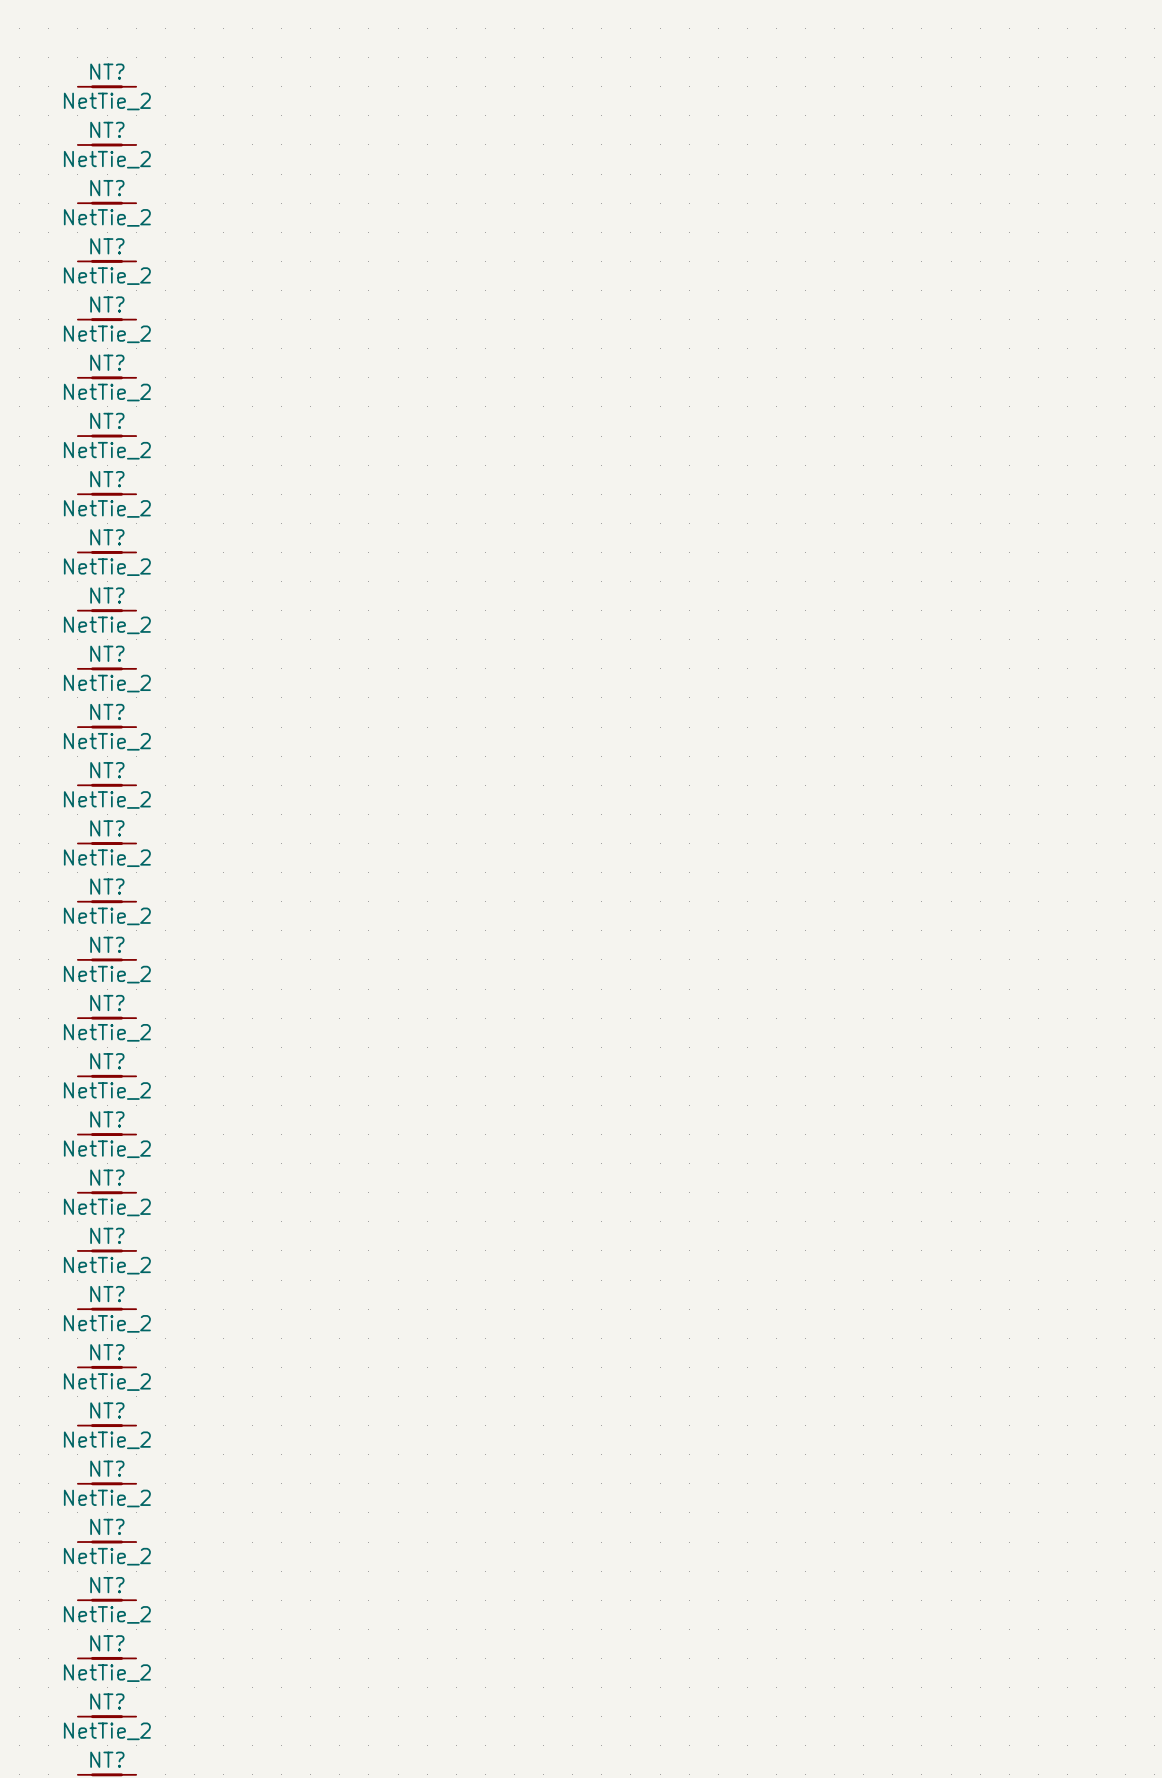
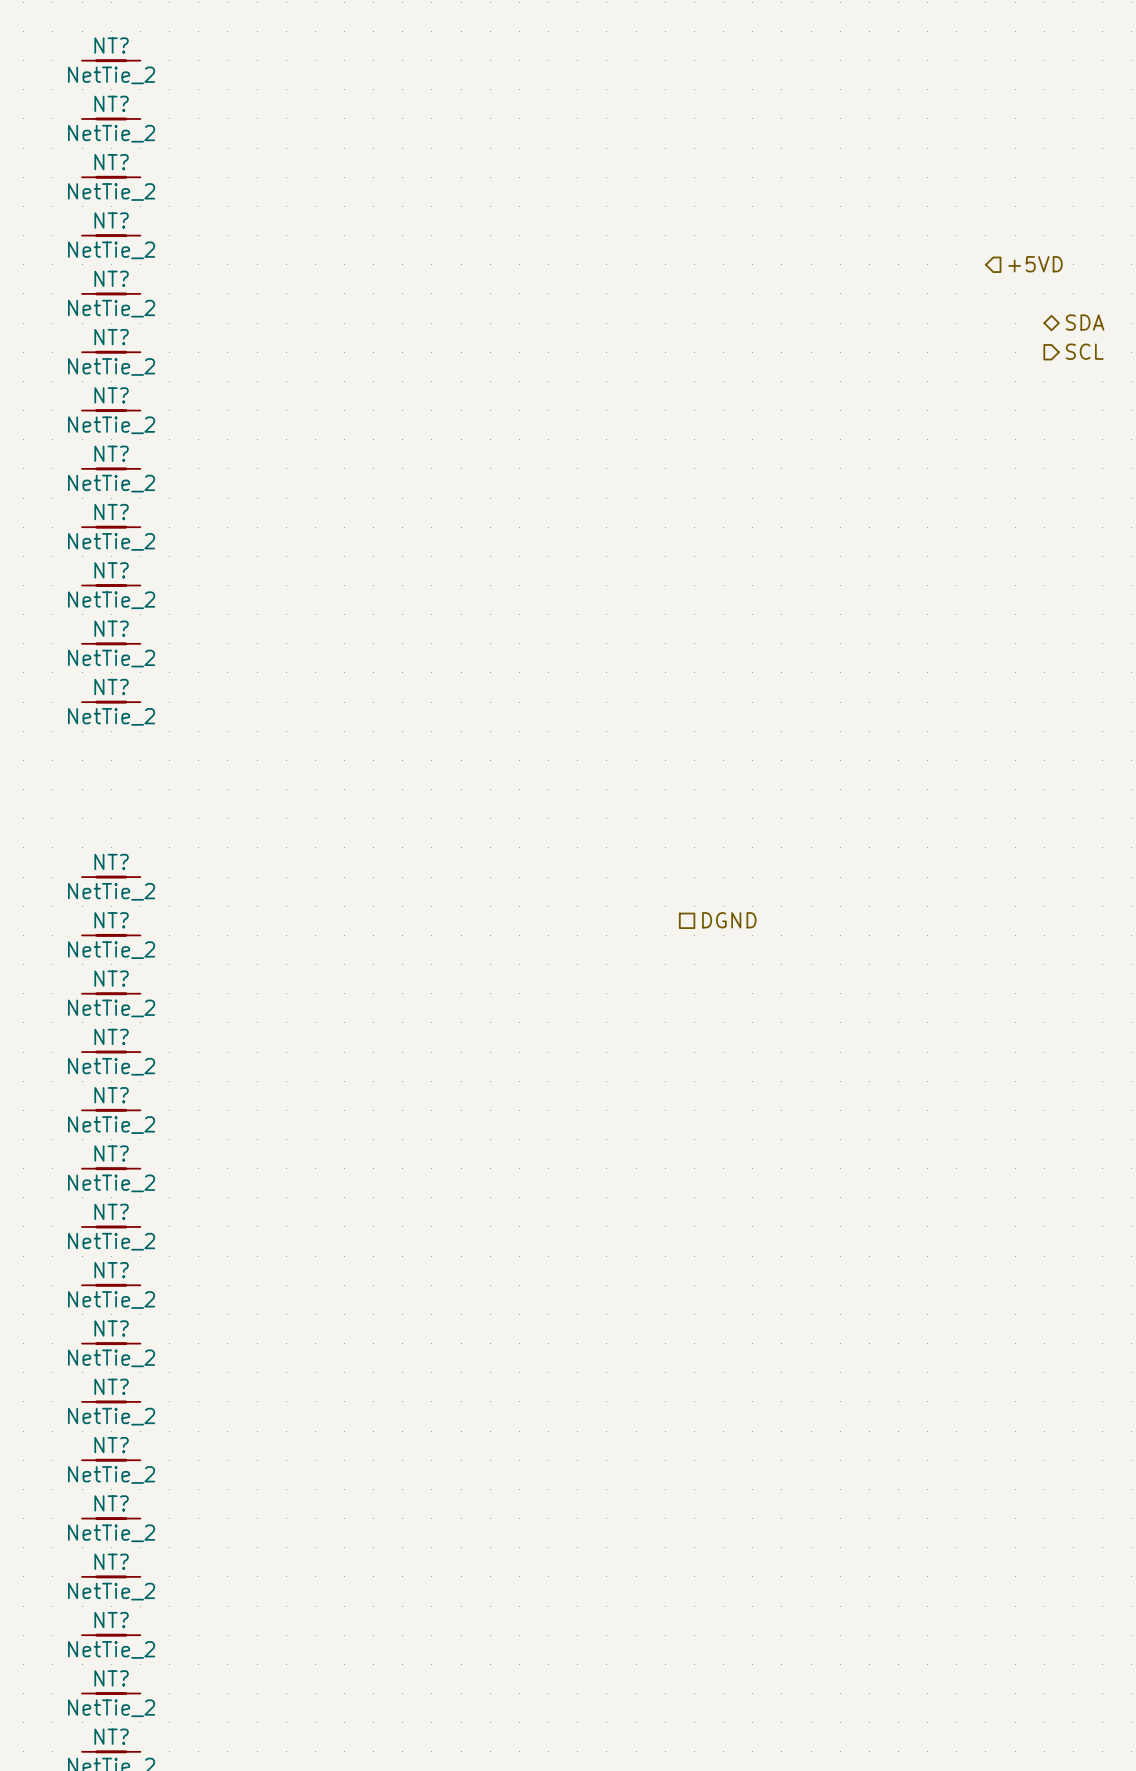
hierarchical label: none -> +5VD (1035, 264)
hierarchical label: none -> SDA (1085, 322)
hierarchical label: none -> SCL (1084, 351)
NT?: NetTie_2 (107, 785) -> none
NT?: NetTie_2 (107, 843) -> none
hierarchical label: none -> DGND (729, 920)

